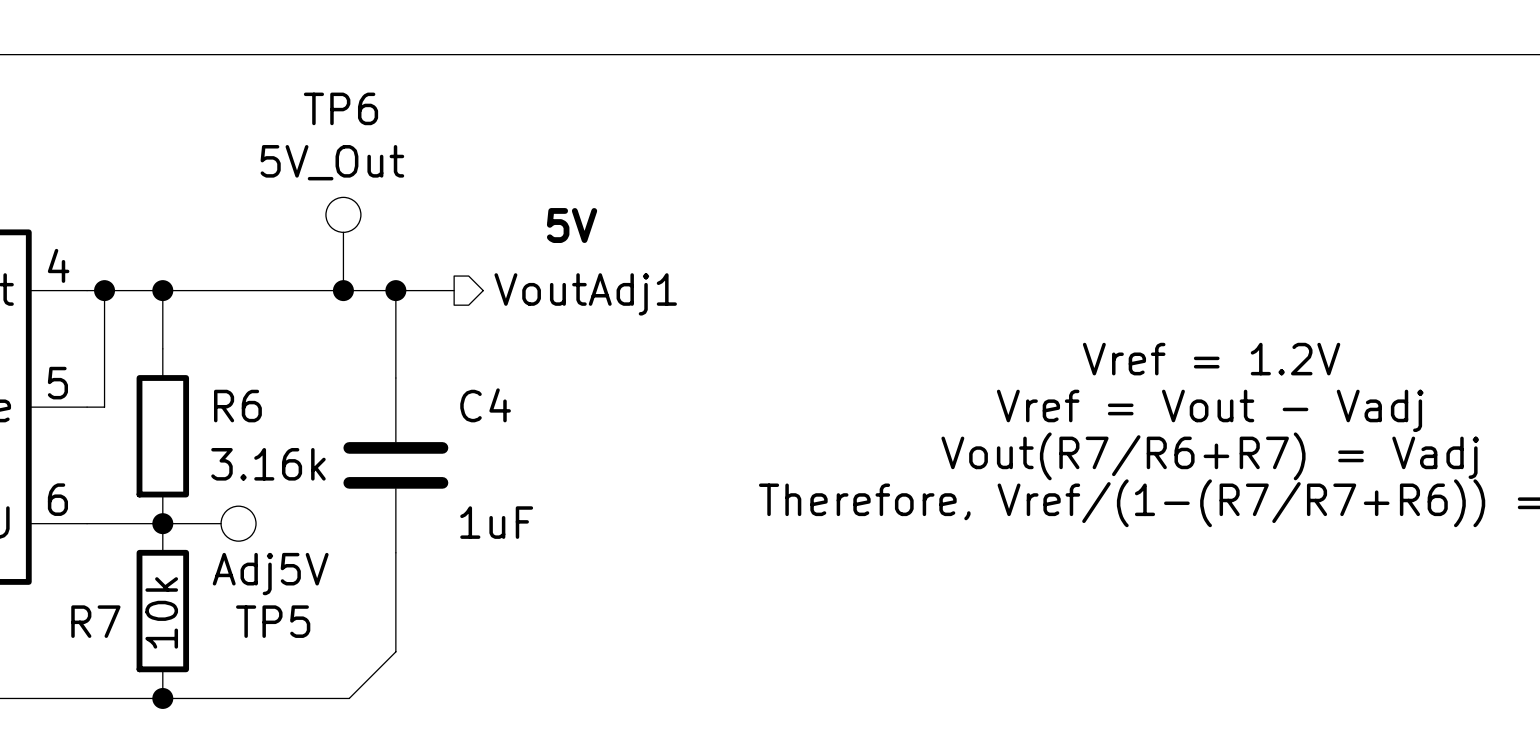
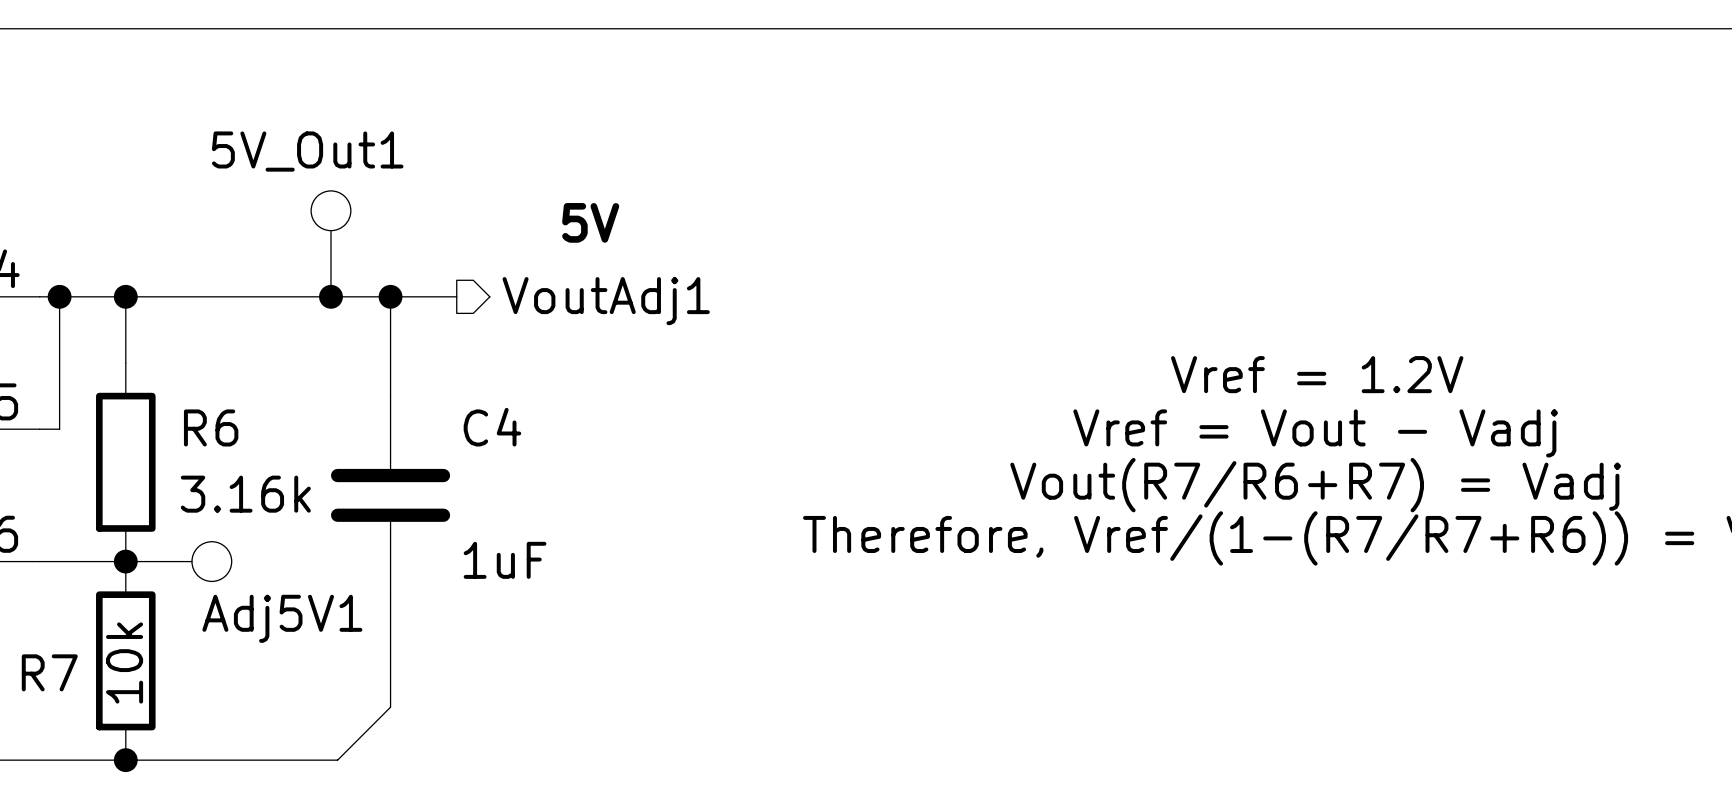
TP6 name: TP6 (340, 108) -> 5V_Out1 (307, 151)
TP6 value: 5V_Out (332, 162) -> none
TP5 value: Adj5V (270, 574) -> none
TP5 name: TP5 (273, 621) -> Adj5V1 (282, 618)

